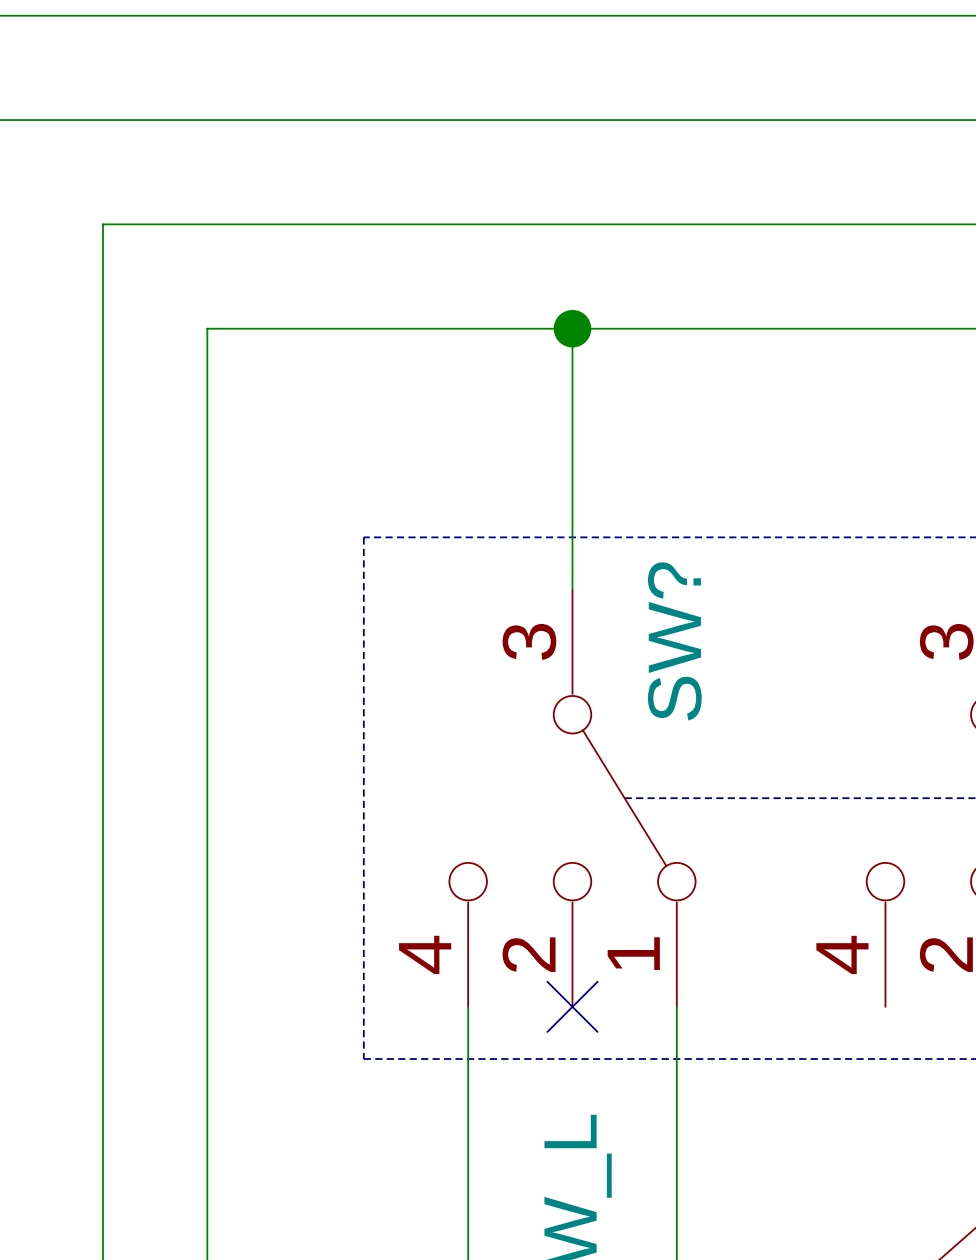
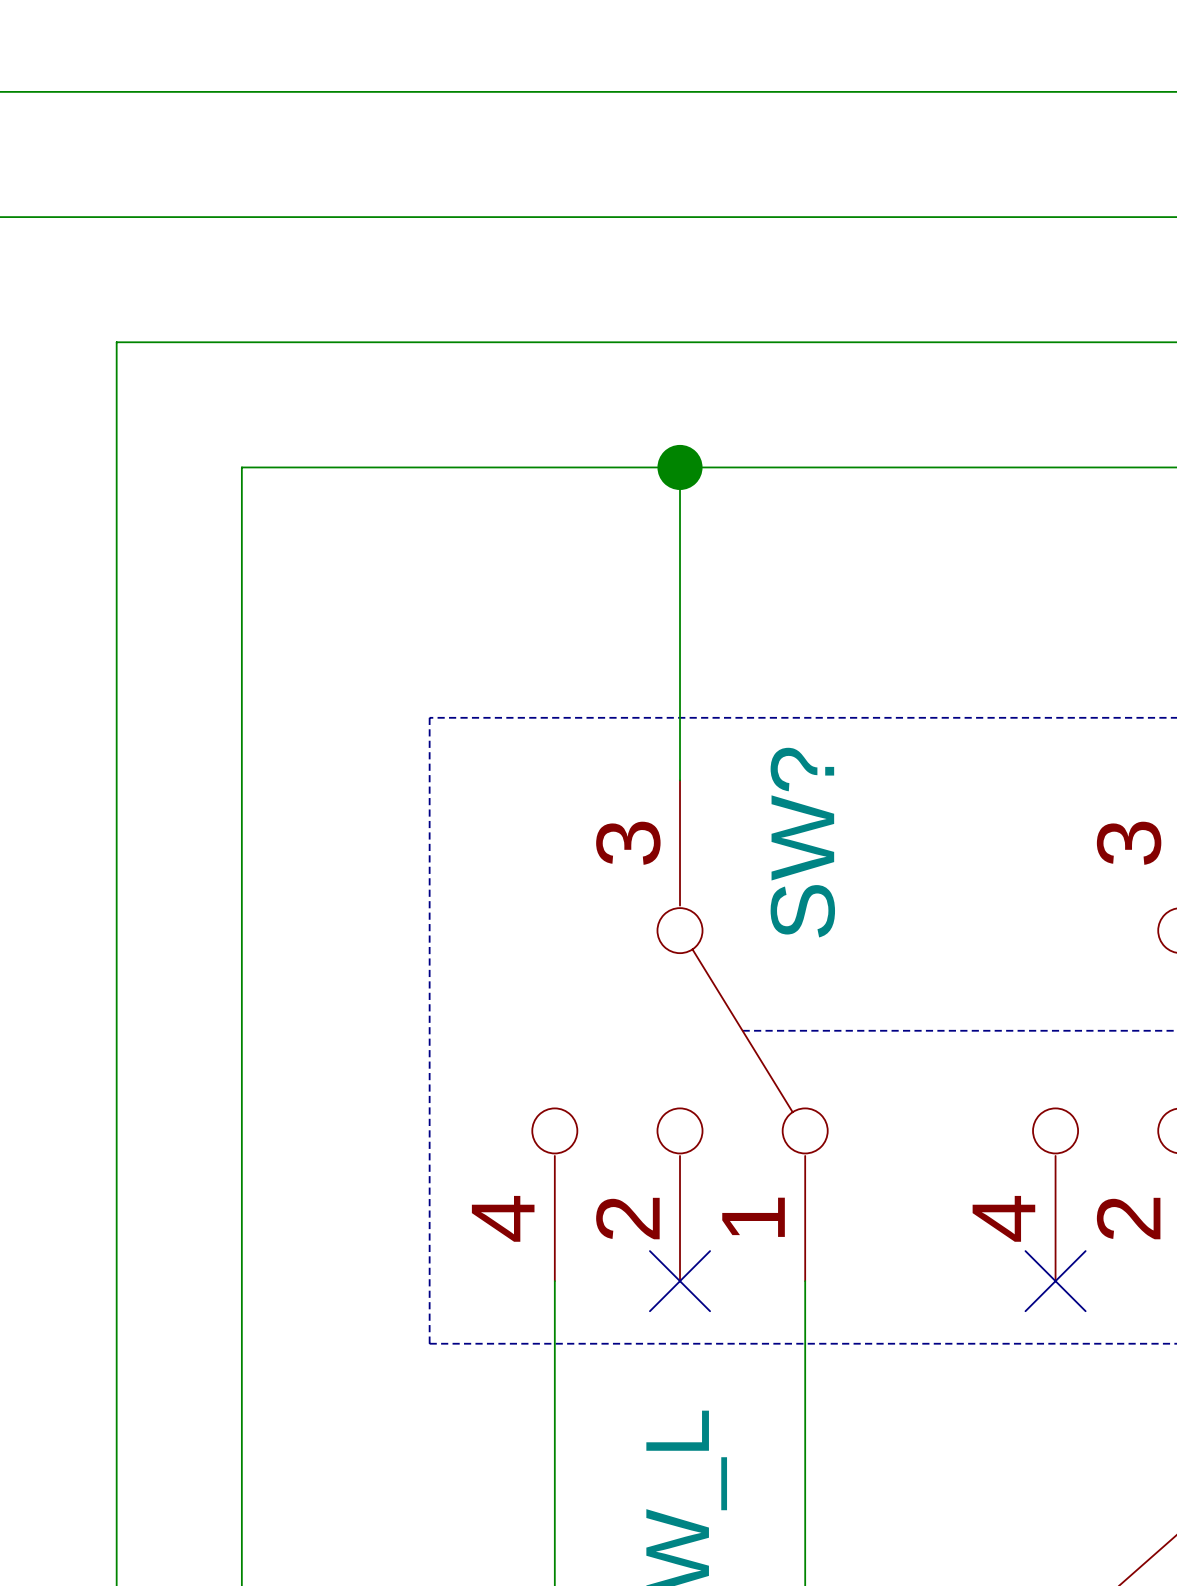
no-connect mark: none -> (1055, 1281)

